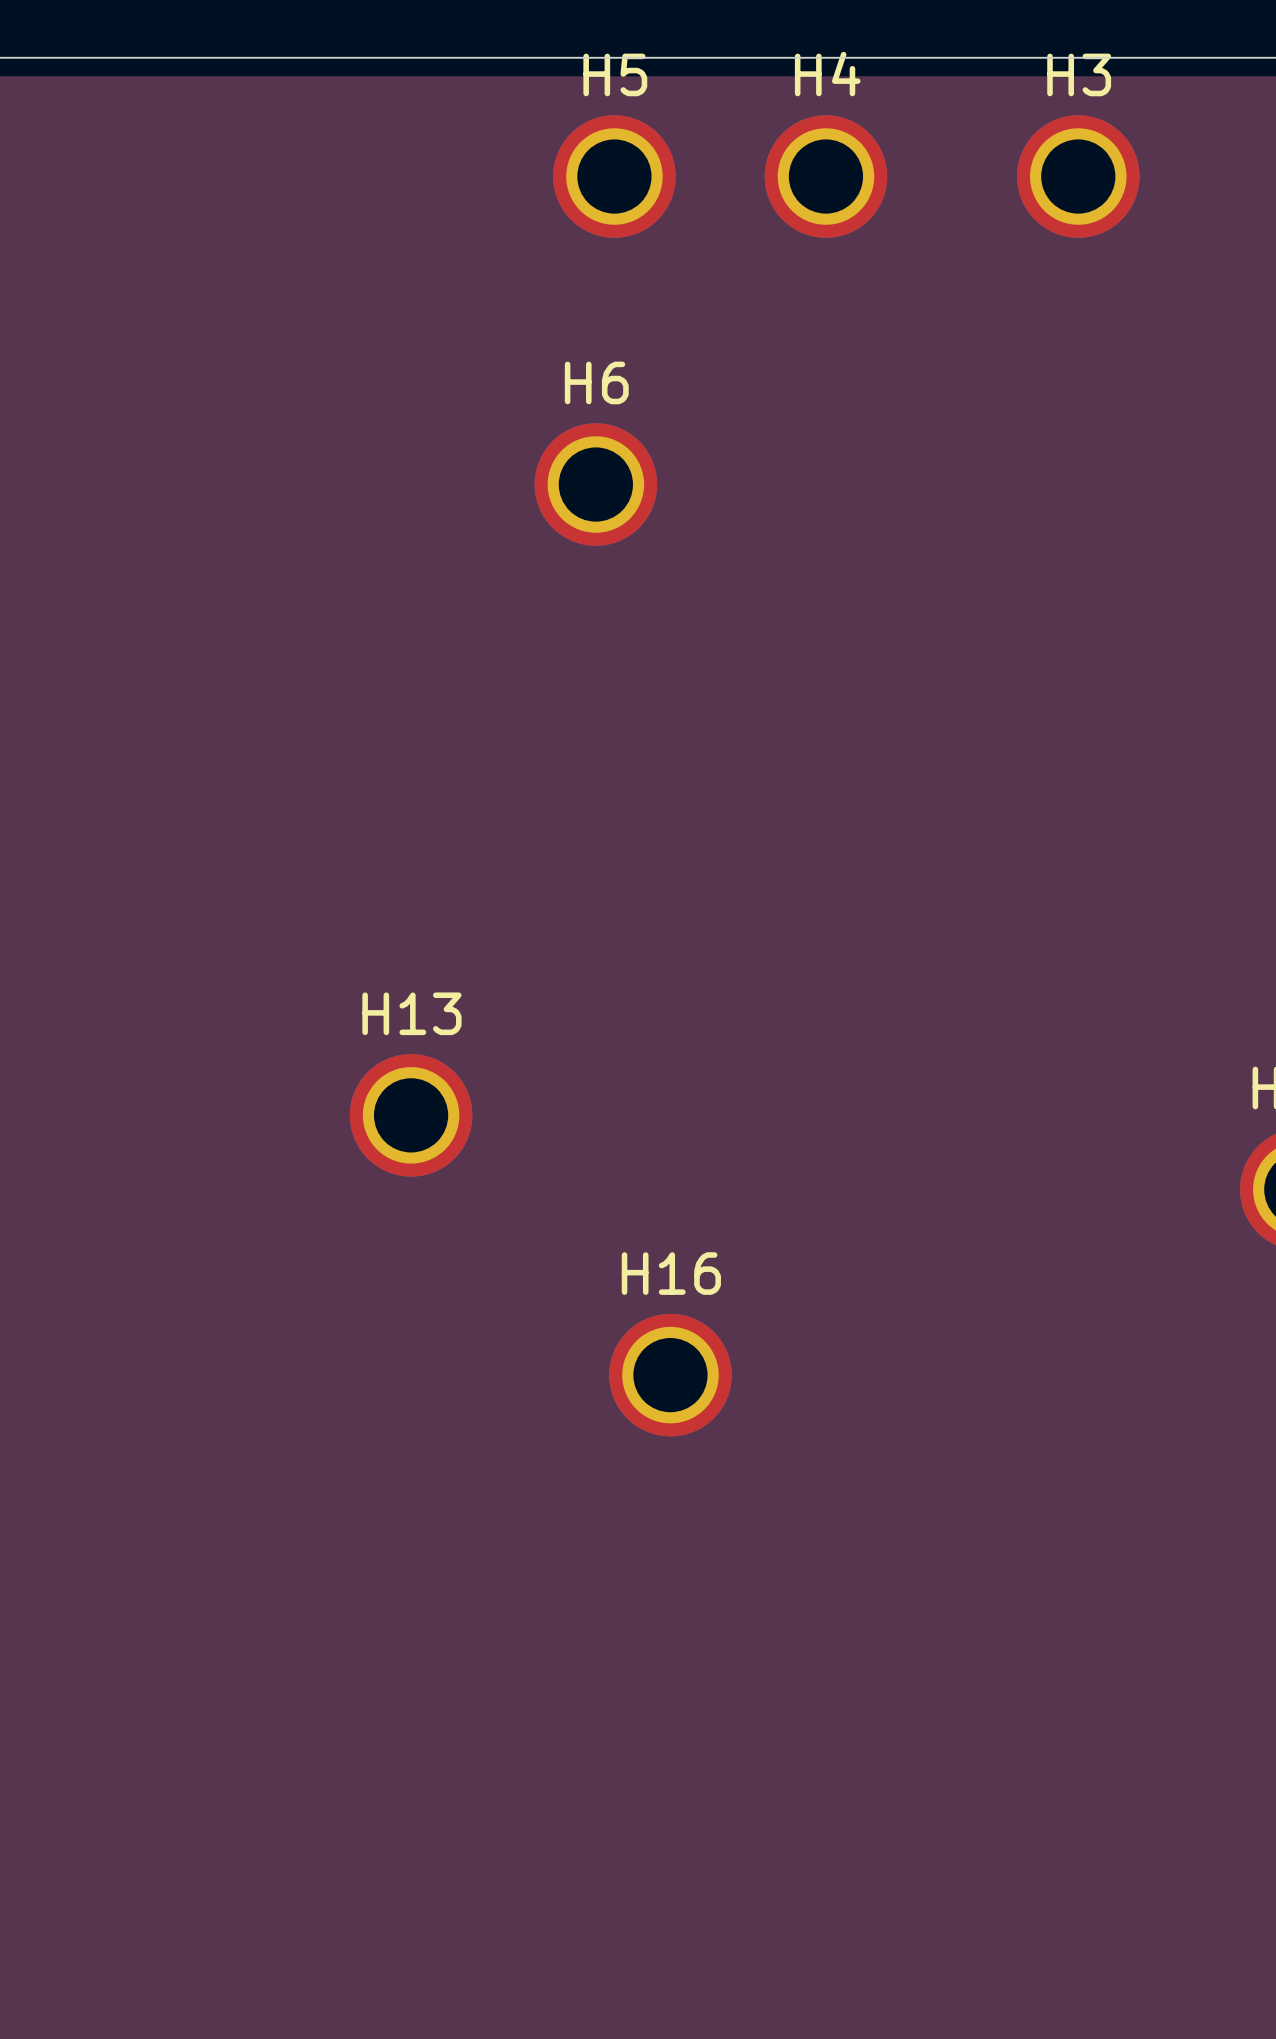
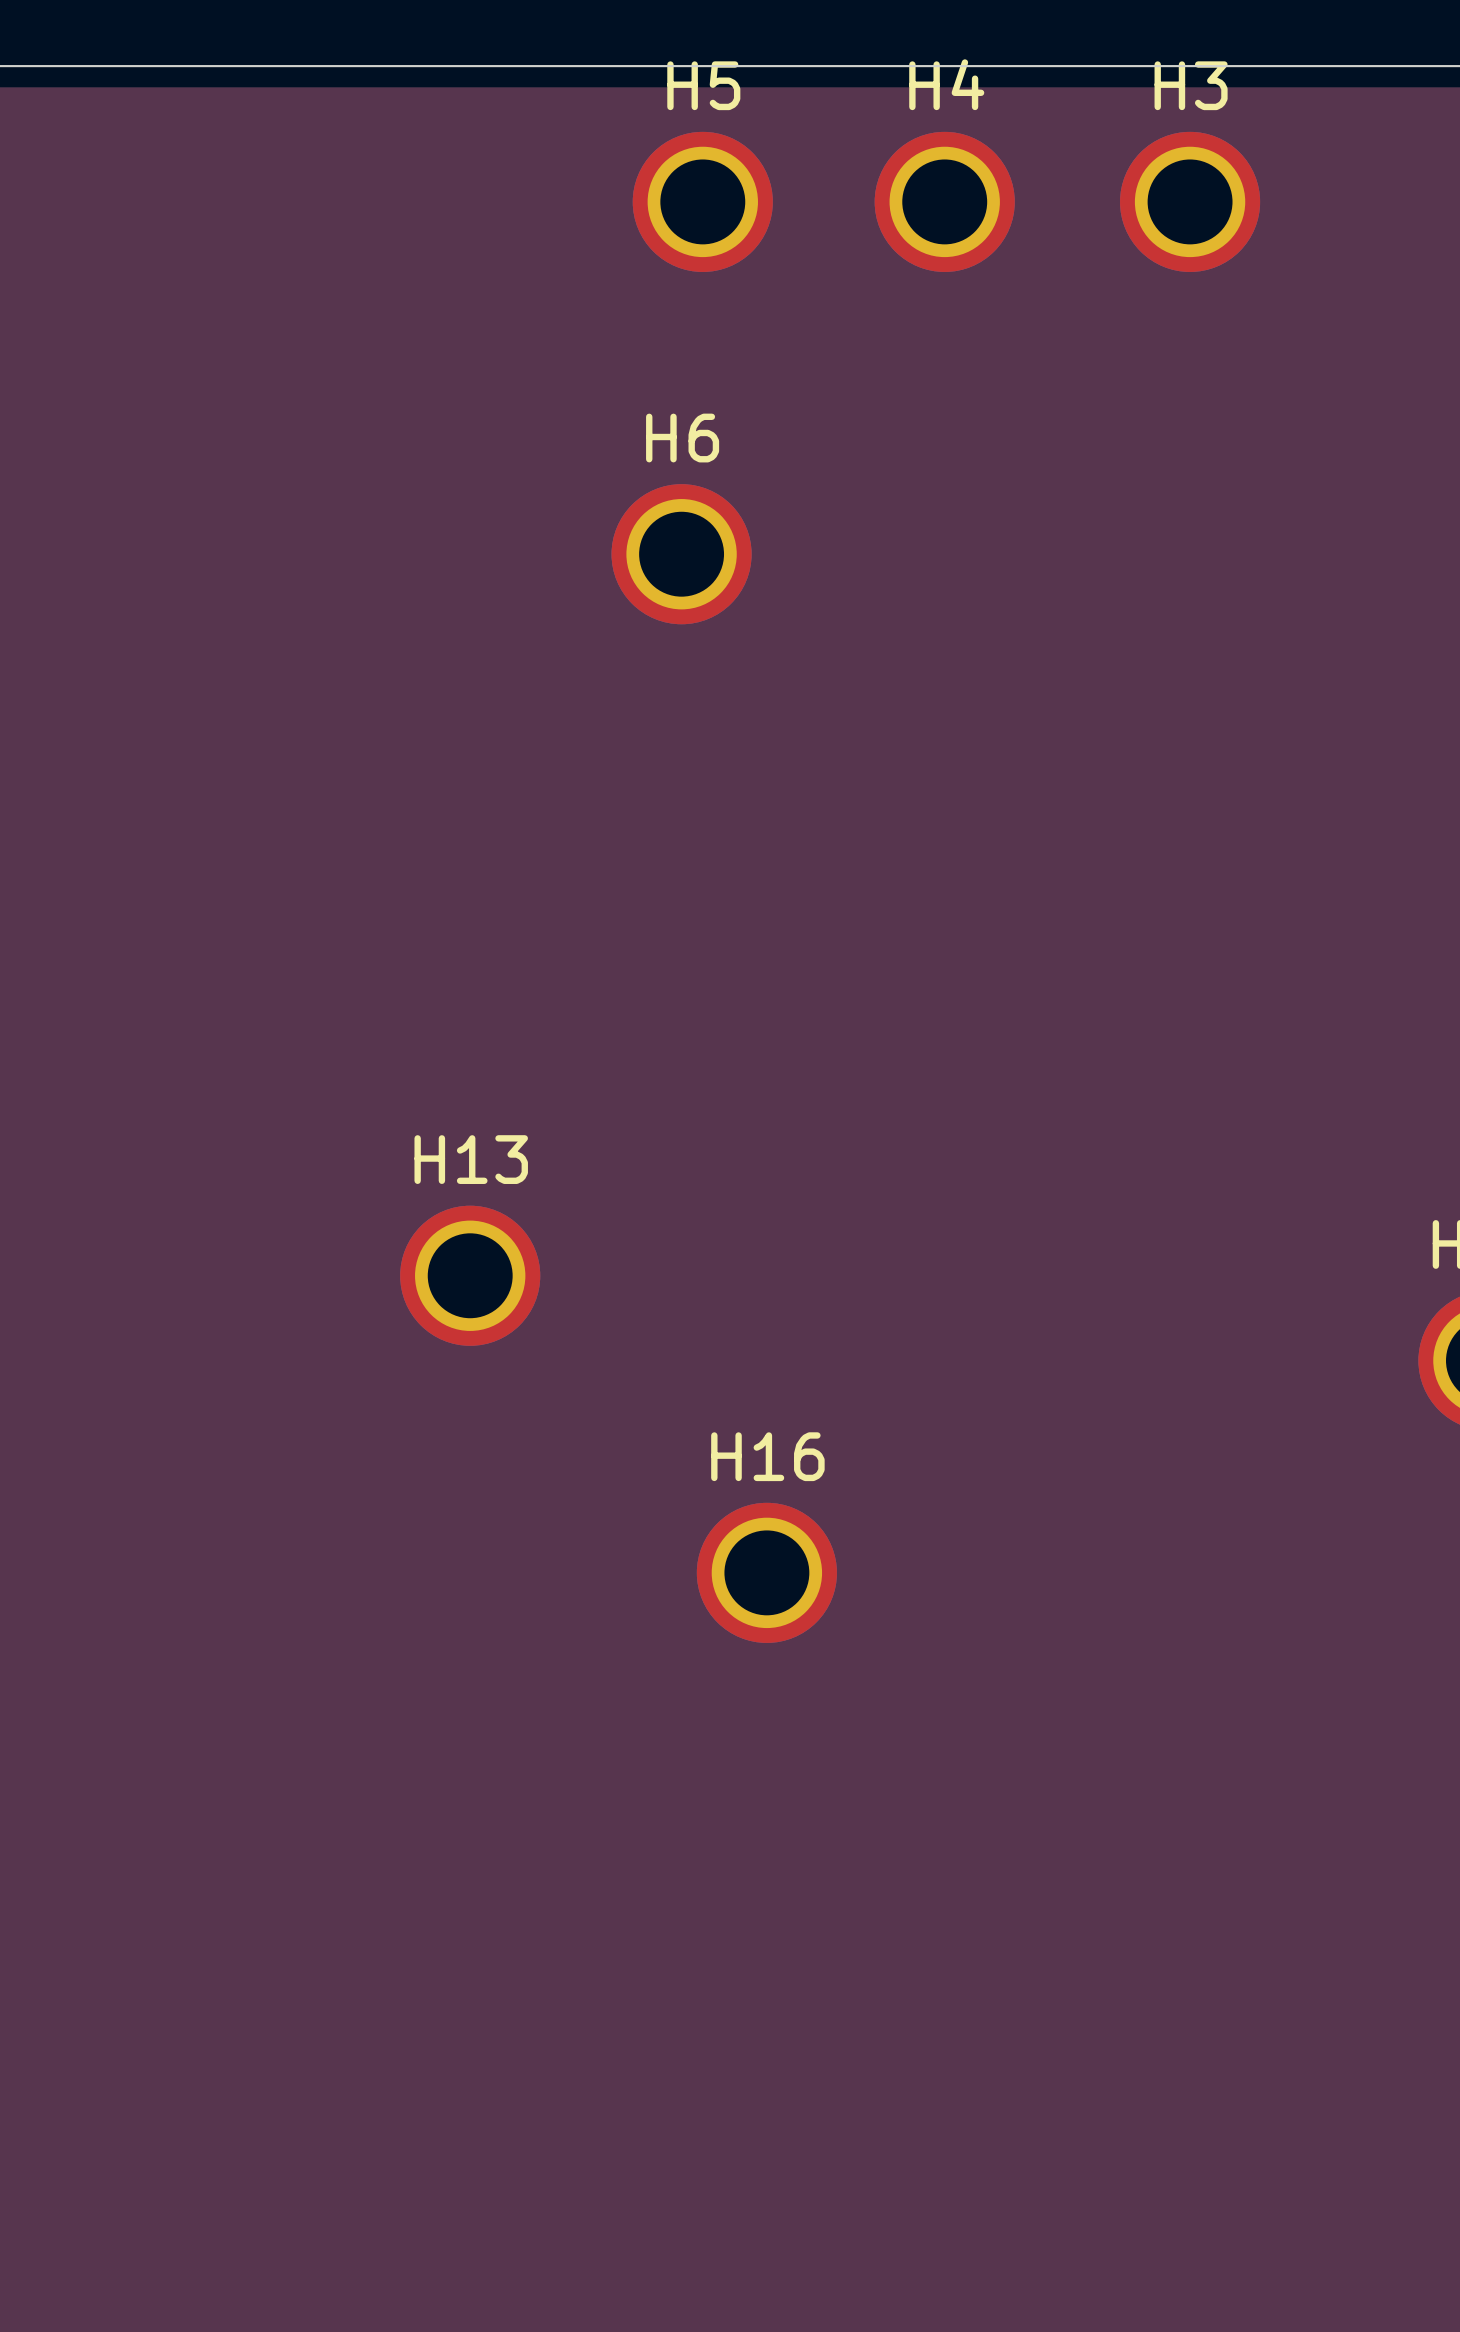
H3 position: (1078, 176) -> (1190, 201)

